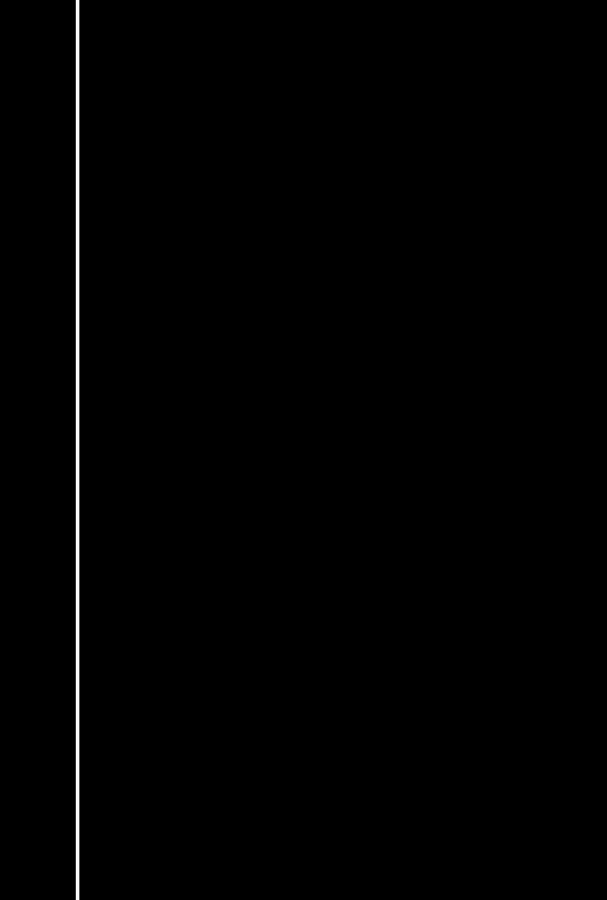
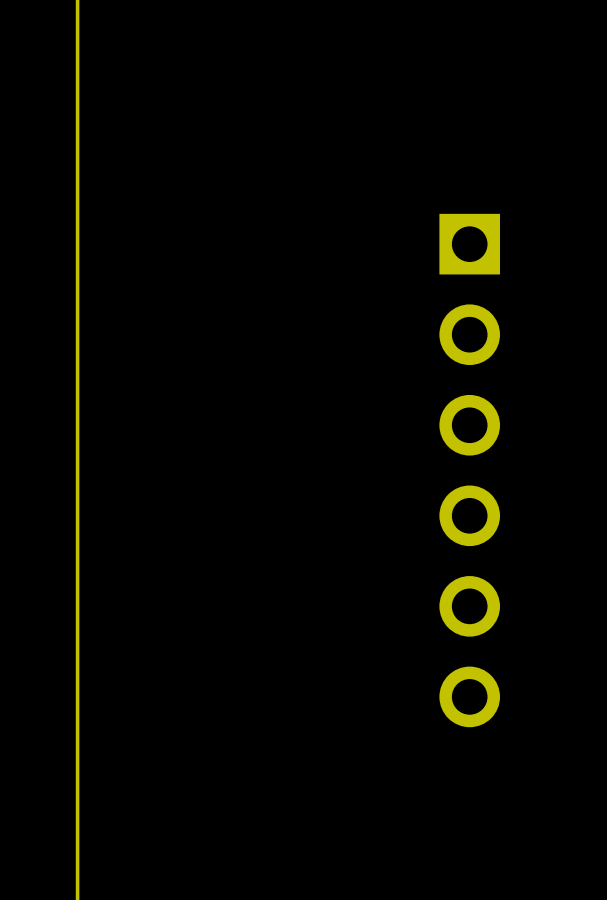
part: none -> (469, 470)

